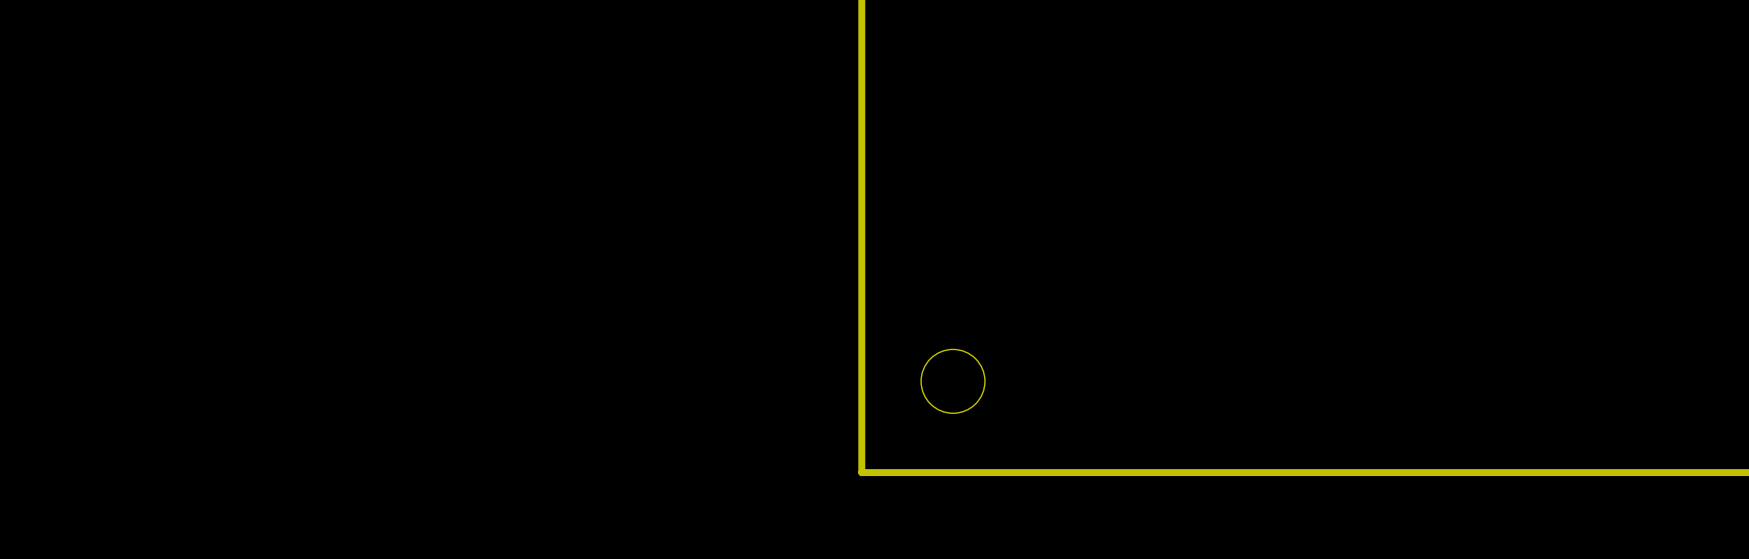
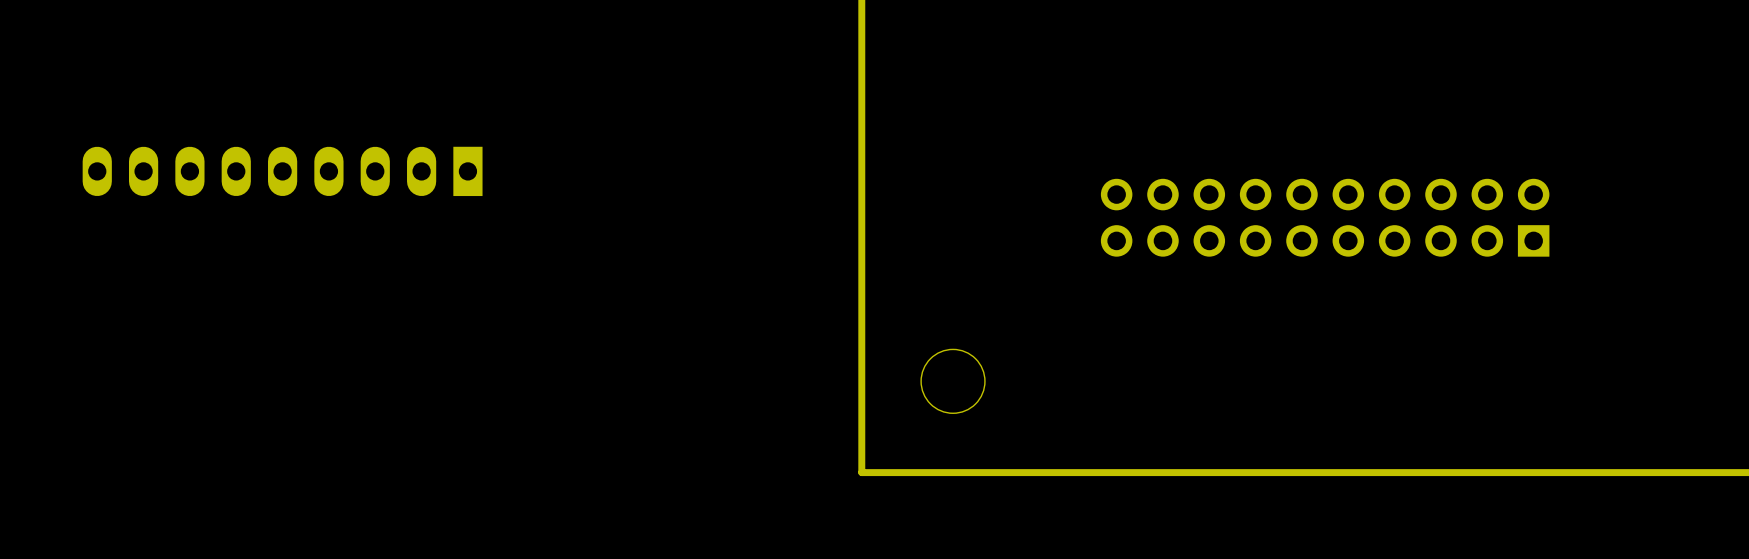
part: none -> (282, 171)
part: none -> (1325, 217)

